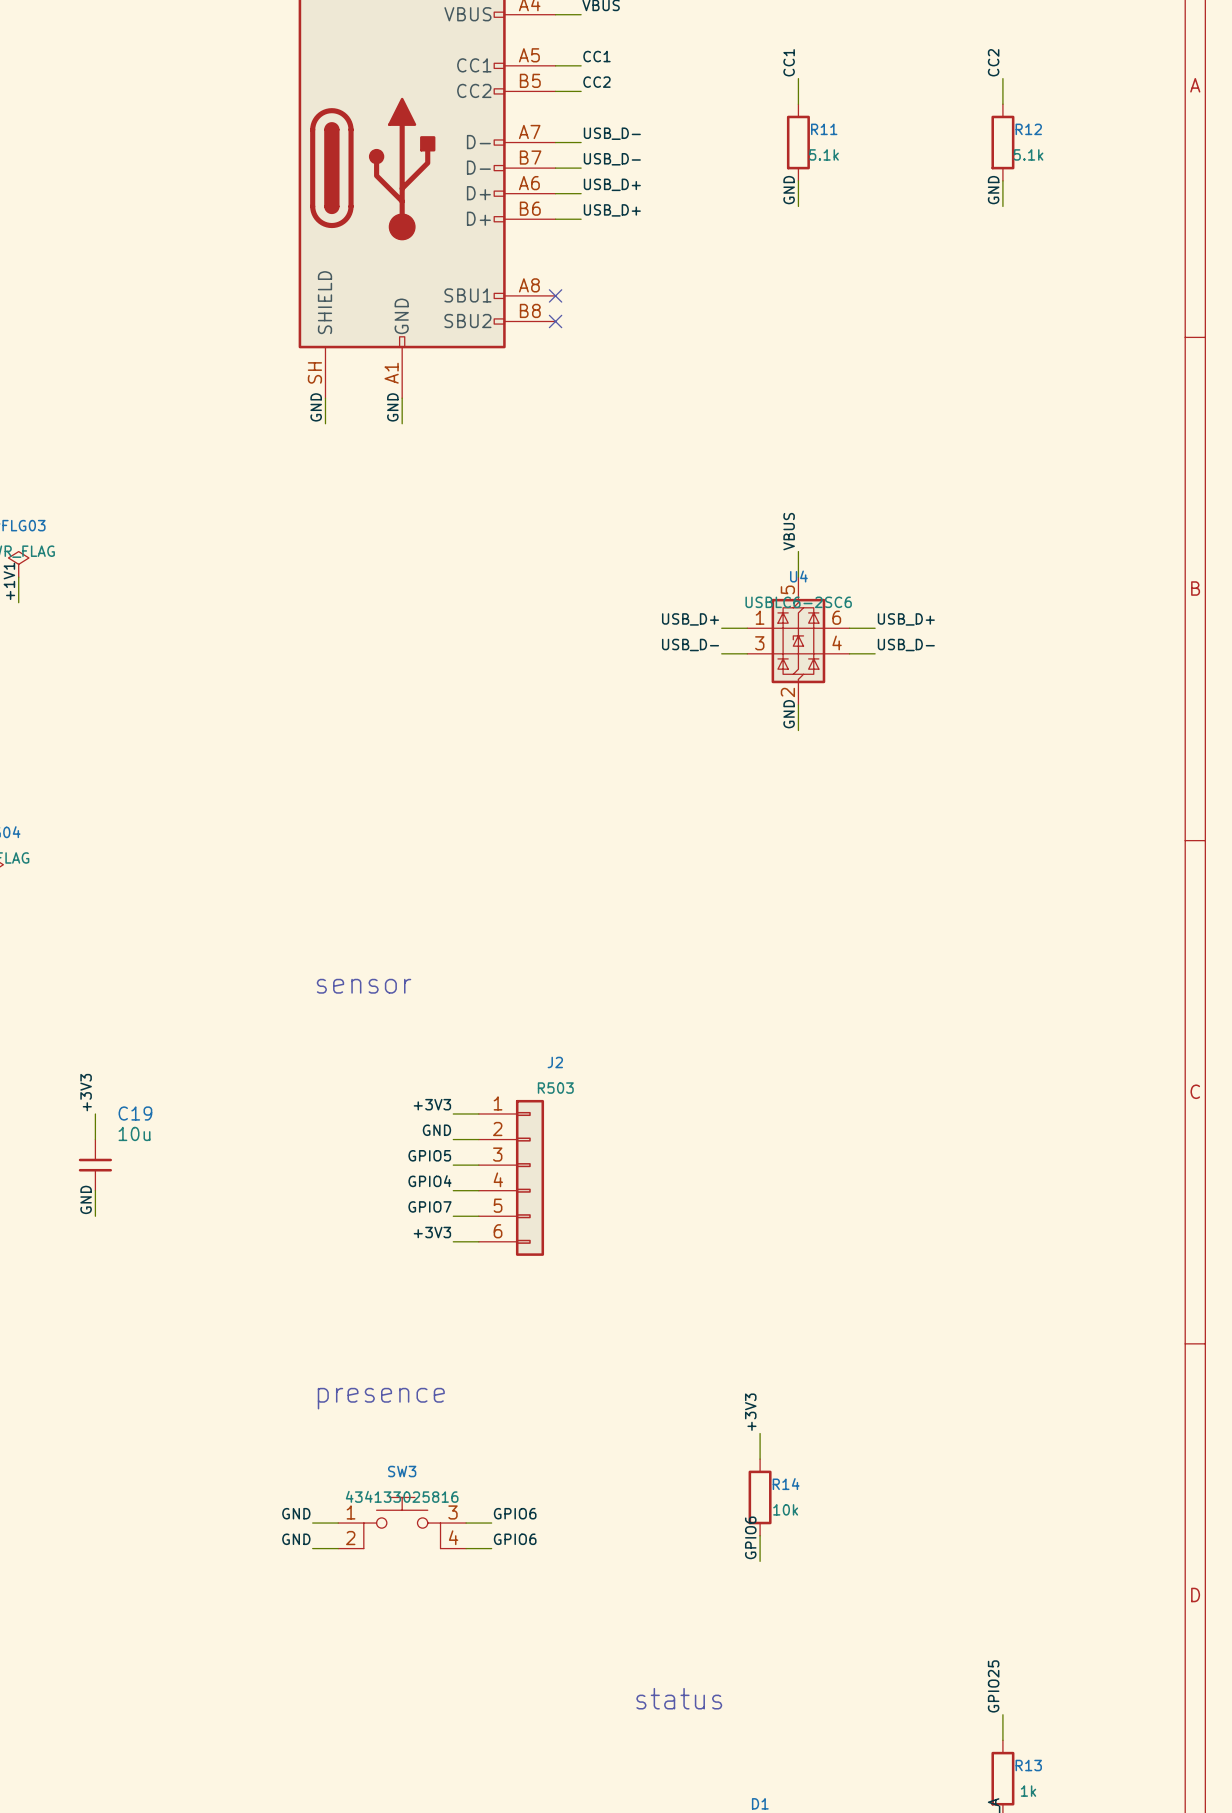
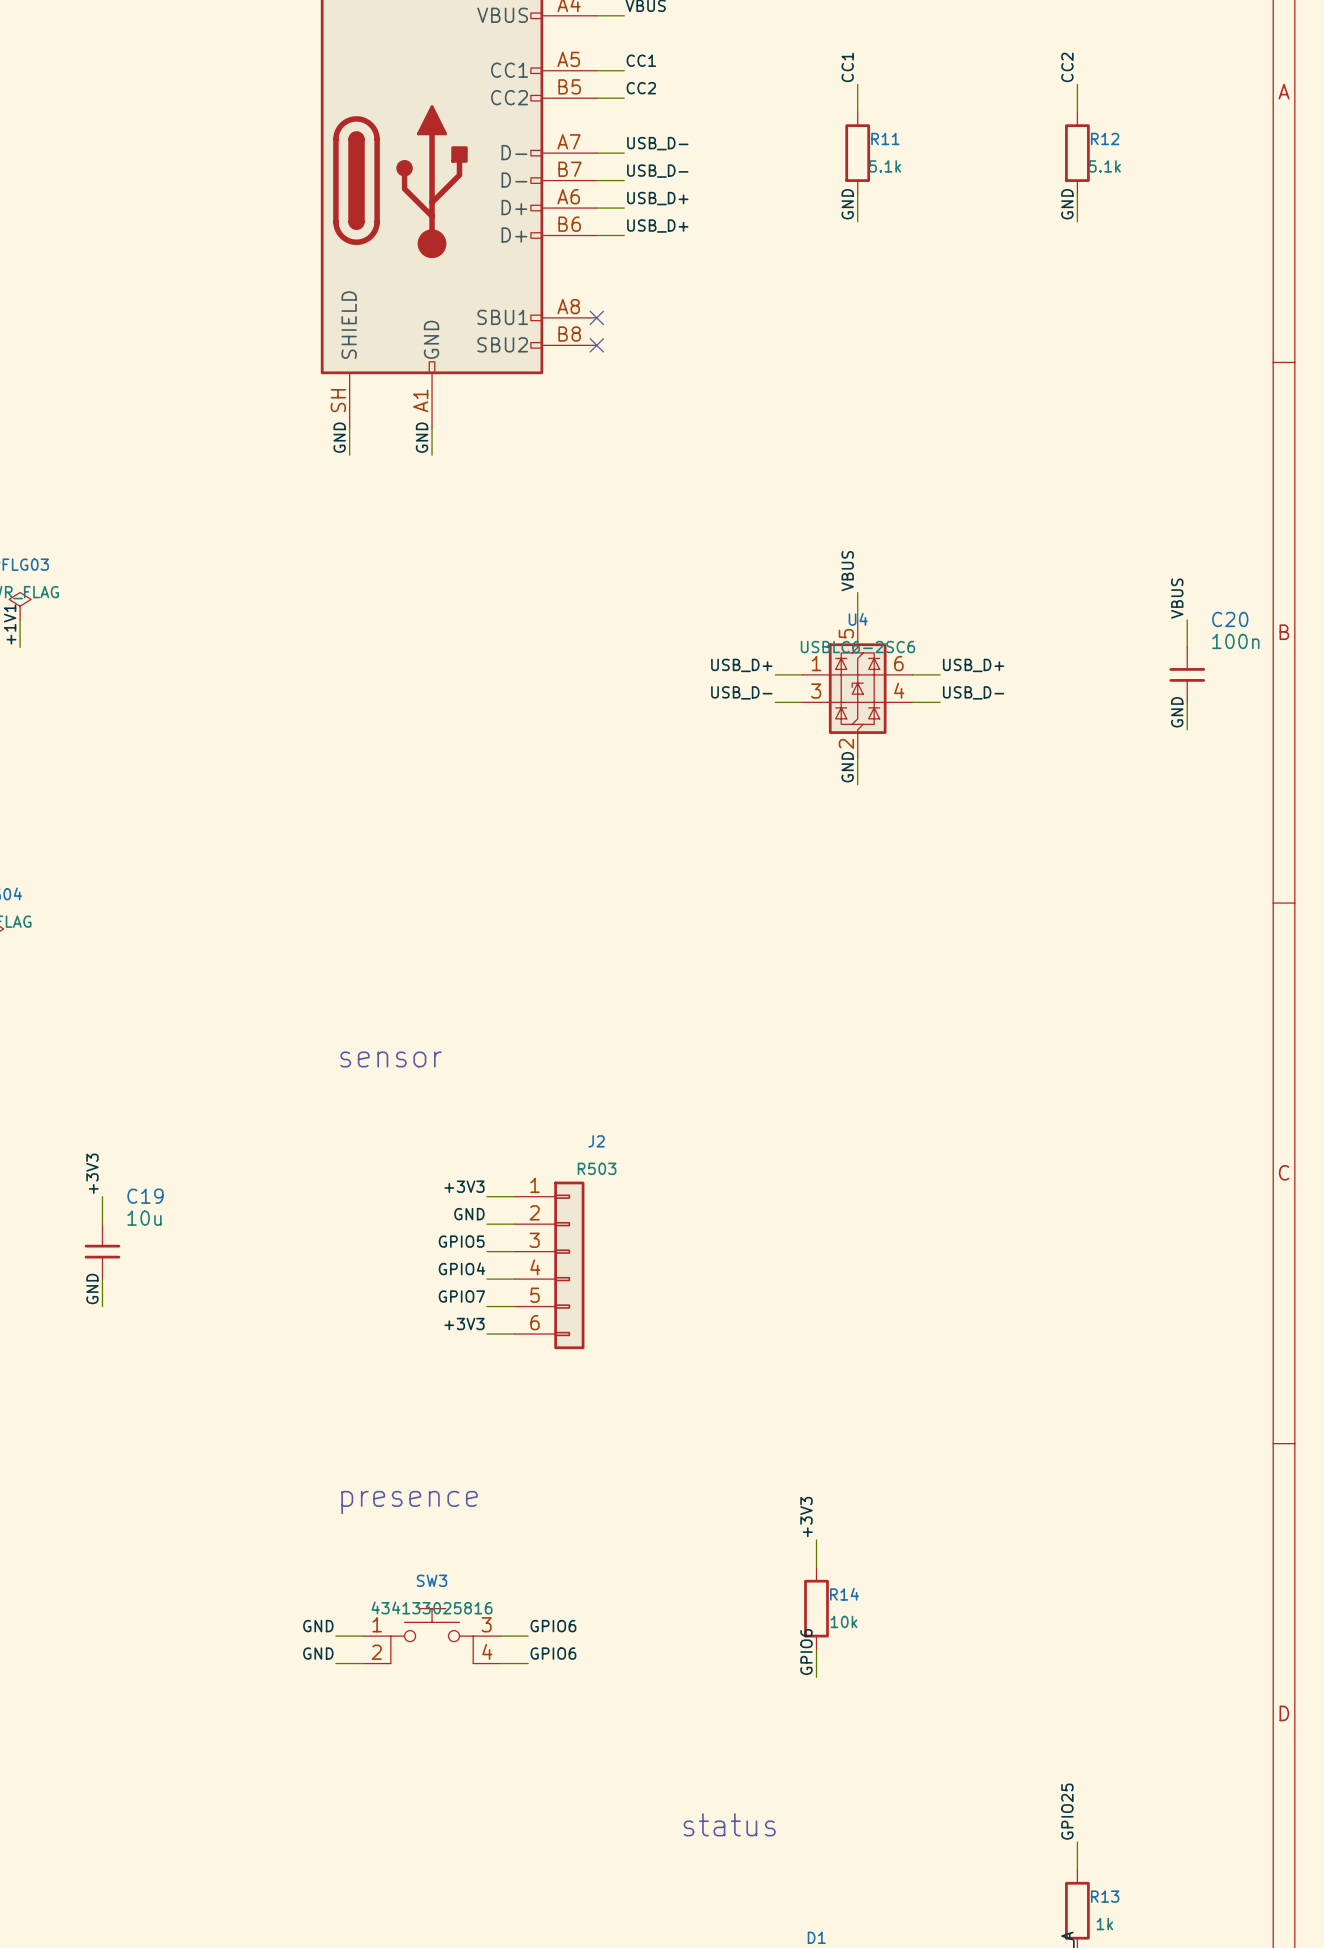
label: none -> VBUS (1177, 598)
wire: none -> (1187, 619) (1187, 647)
C20: none -> 100n (1187, 674)
wire: none -> (1187, 702) (1187, 729)
label: none -> GND (1177, 712)

